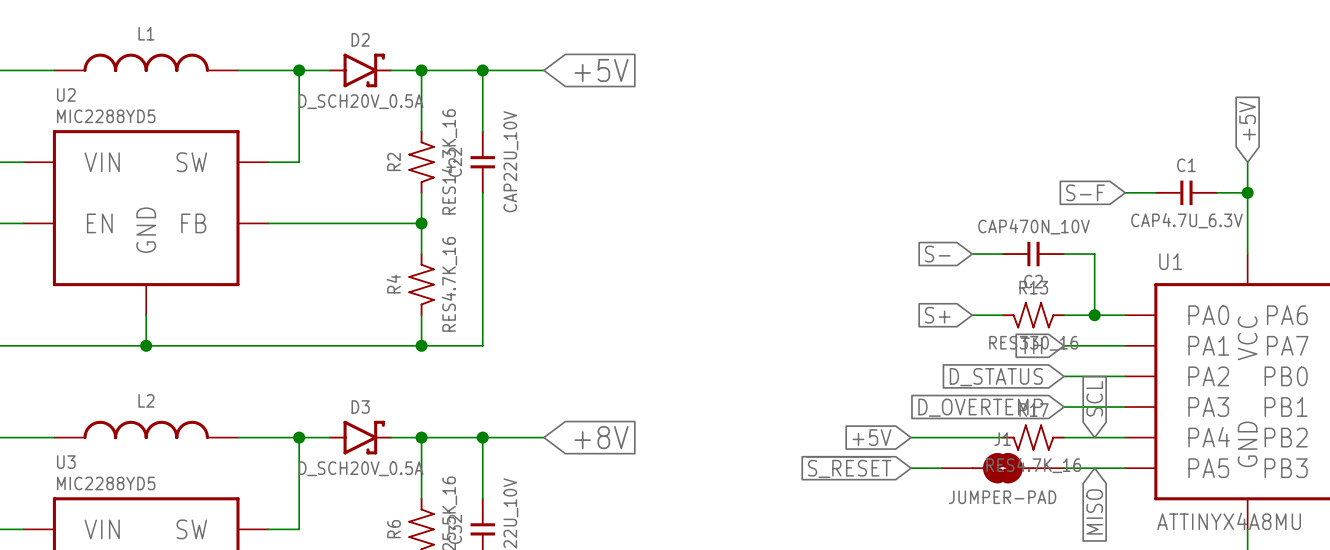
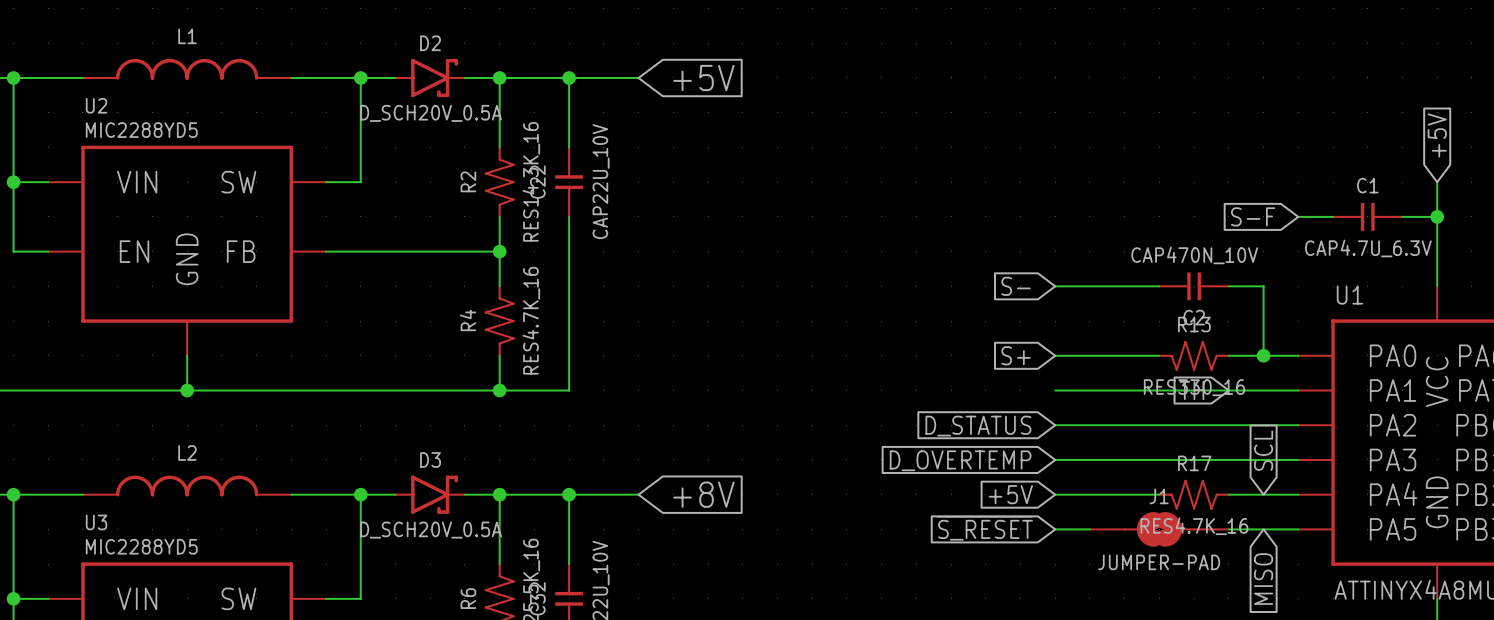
wire: none -> (1055, 286) (1124, 286)
global label position: S- (937, 254) -> S- (1016, 286)
wire: none -> (1055, 355) (1124, 355)
global label position: S+ (937, 315) -> S+ (1016, 355)
wire: none -> (1055, 390) (1228, 390)
wire: none -> (1055, 425) (1228, 425)
global label position: D_STATUS (996, 377) -> D_STATUS (978, 426)
wire: none -> (1055, 459) (1228, 459)
global label position: D_OVERTEMP (980, 407) -> D_OVERTEMP (960, 460)

